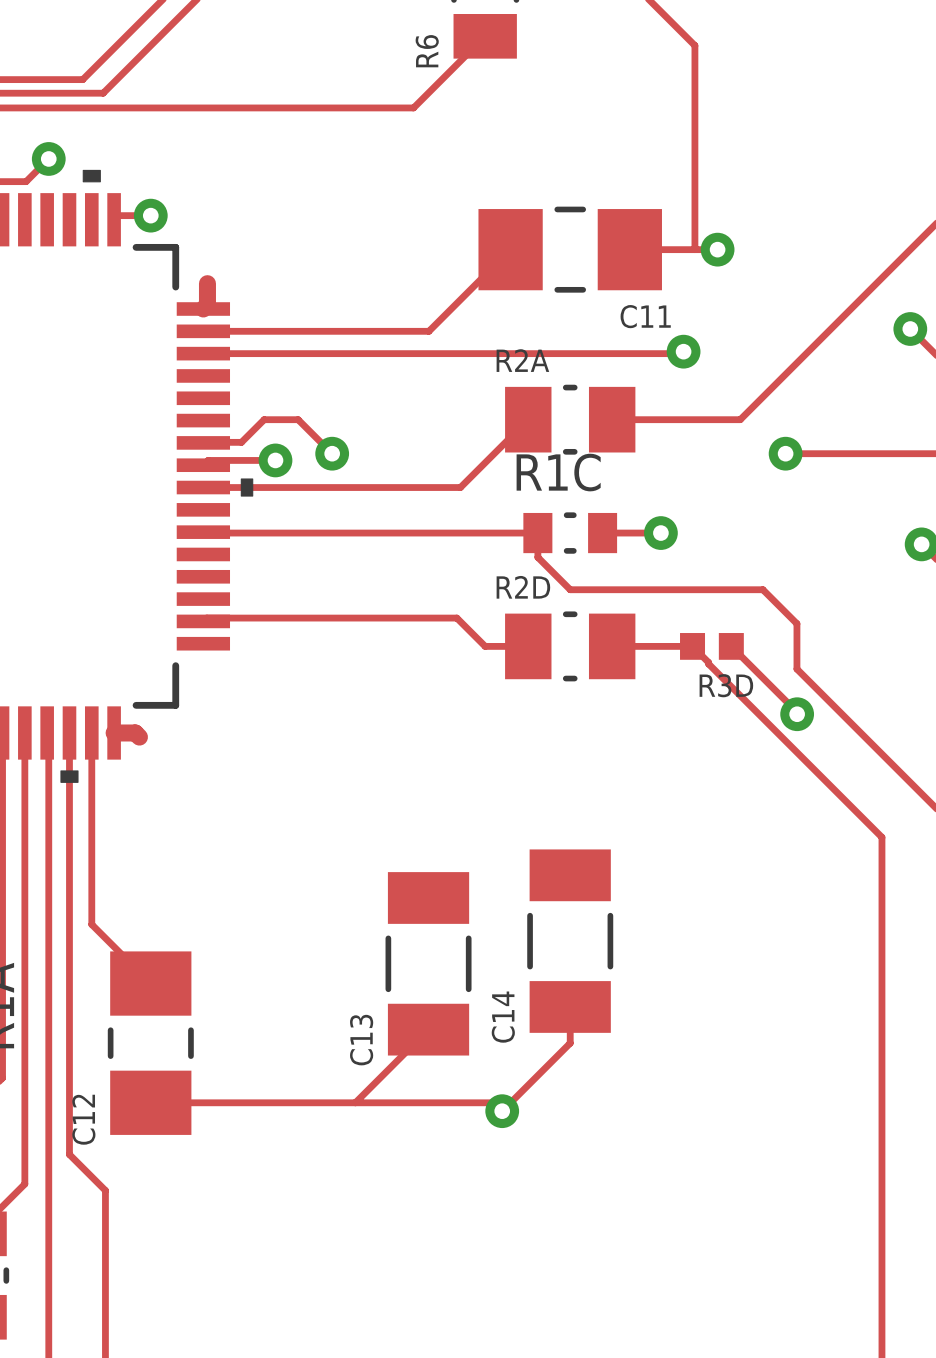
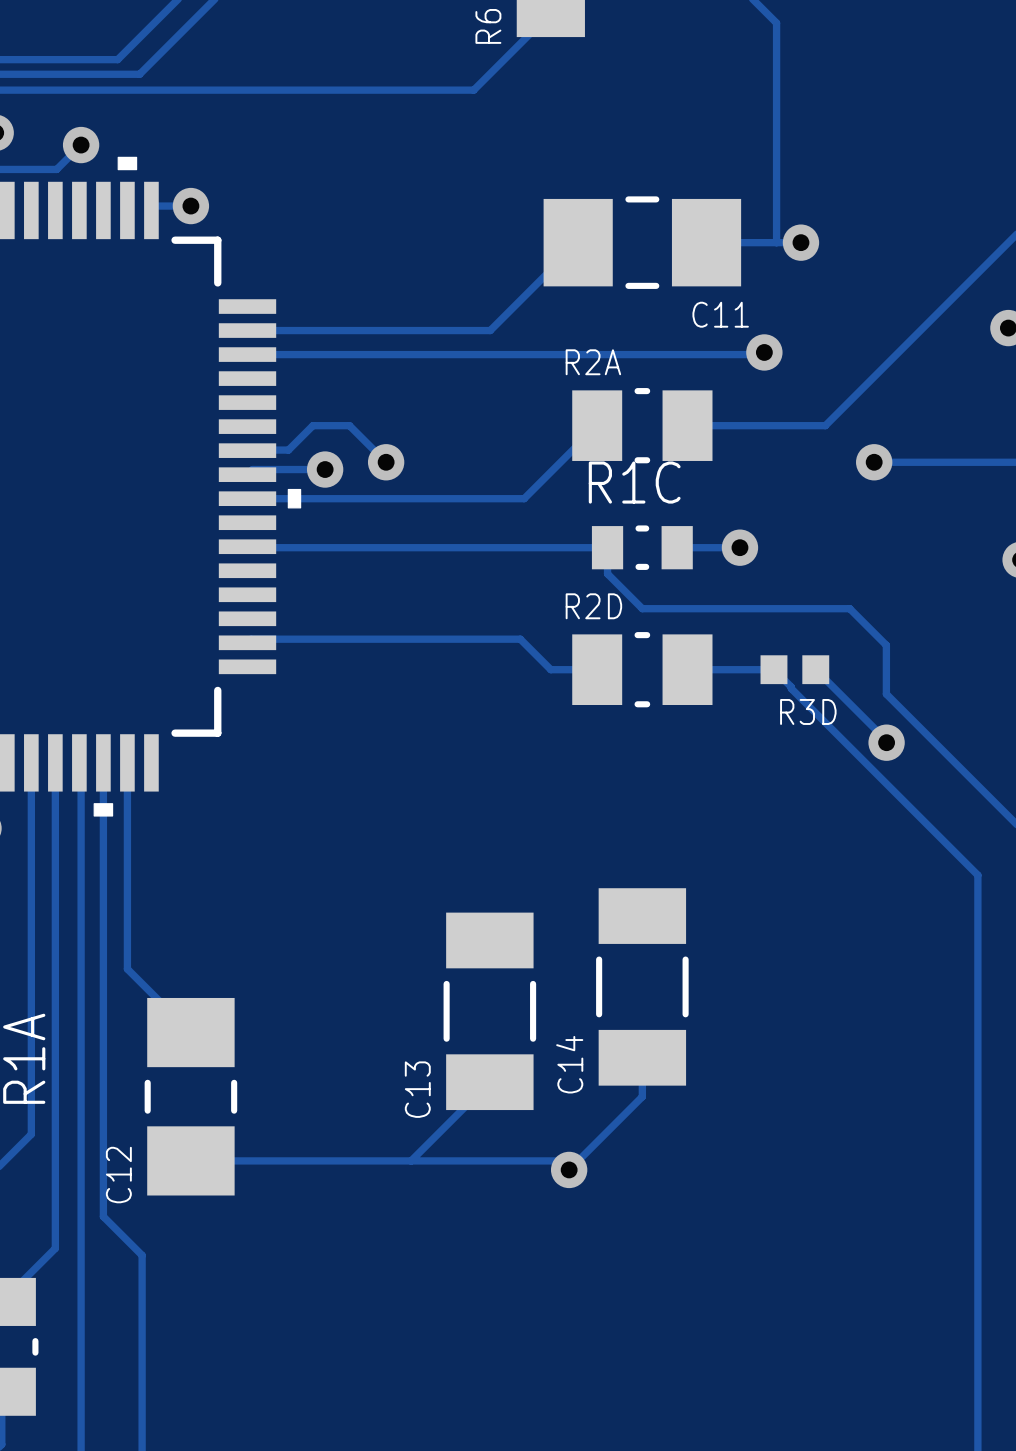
track: (207, 283) (207, 304) (203, 309) -> none
track: (114, 732) (135, 732) (139, 737) -> none

